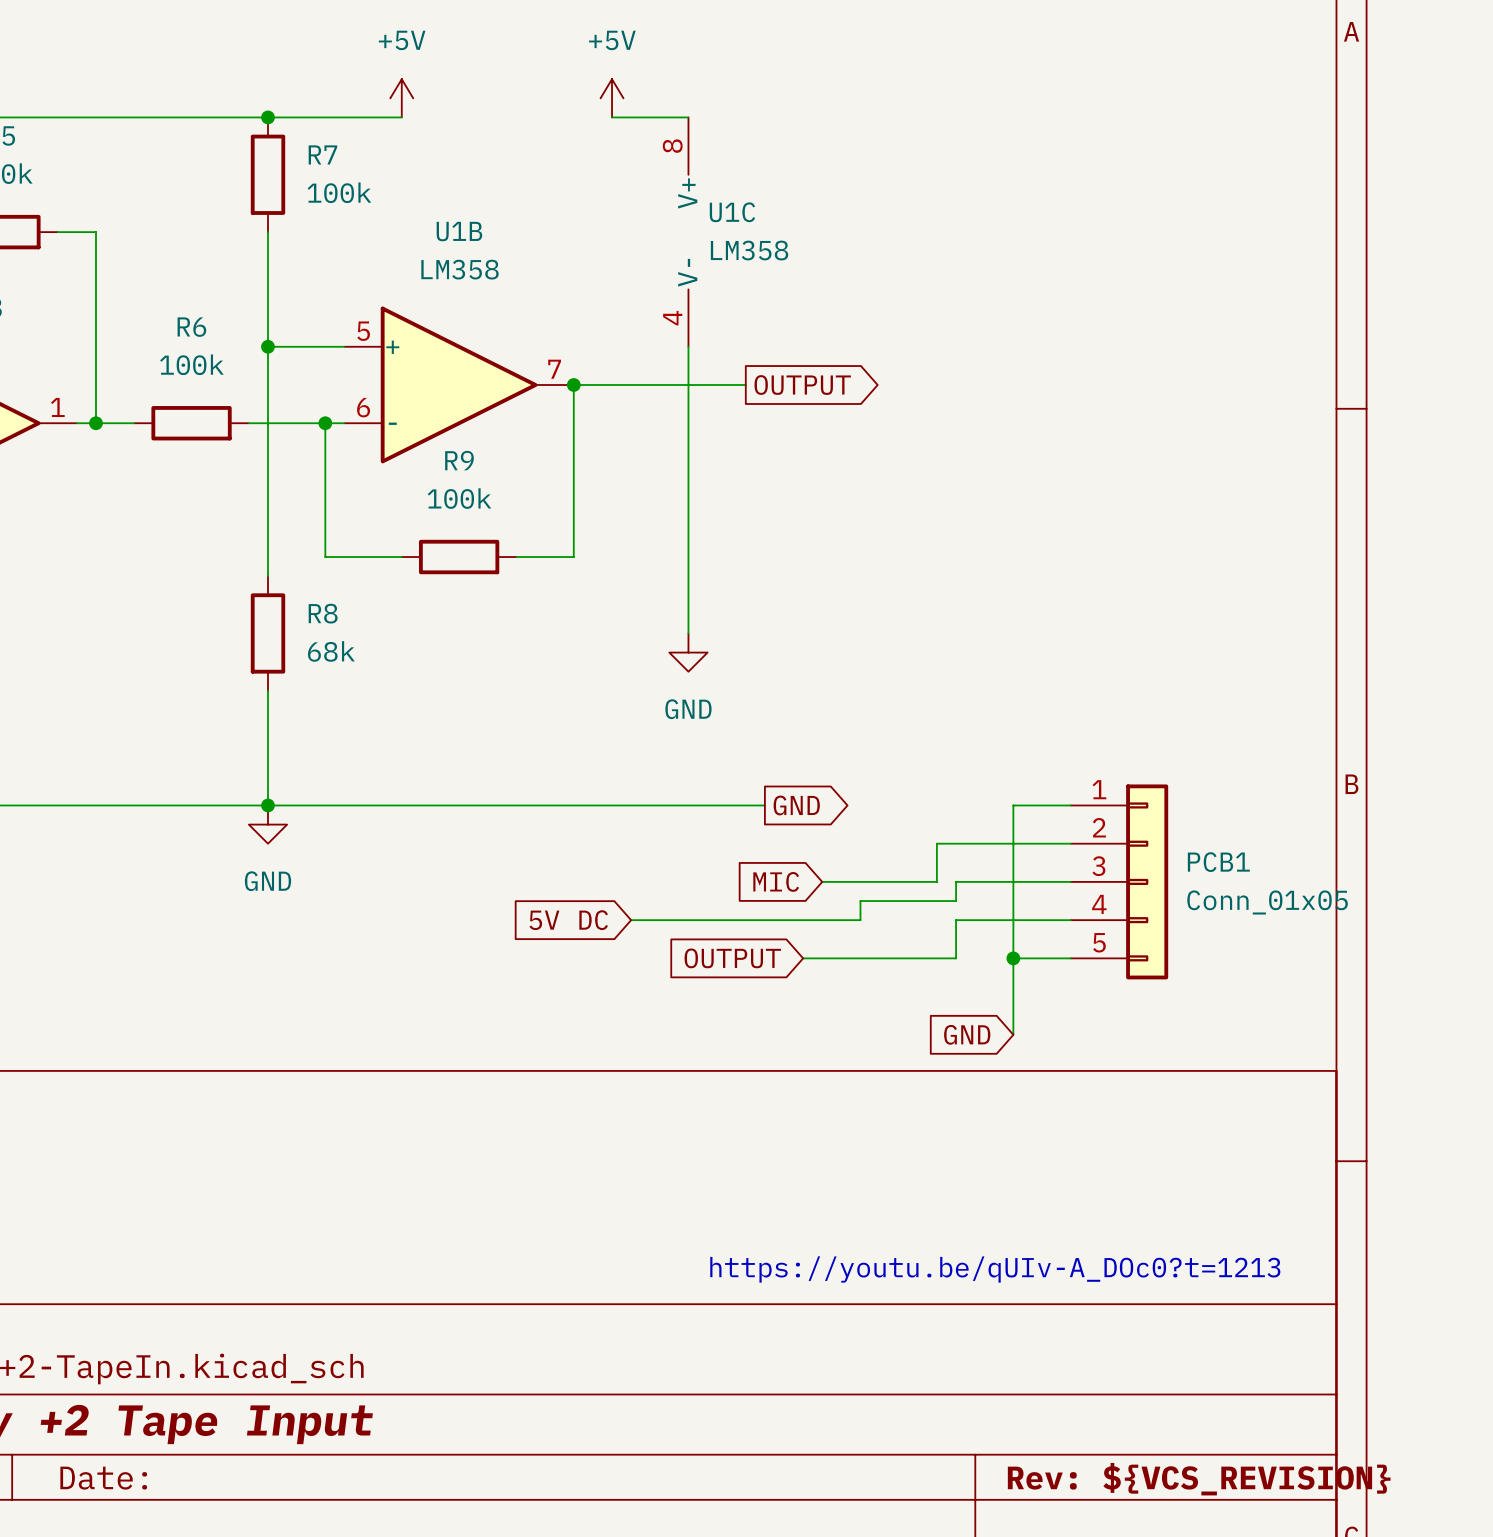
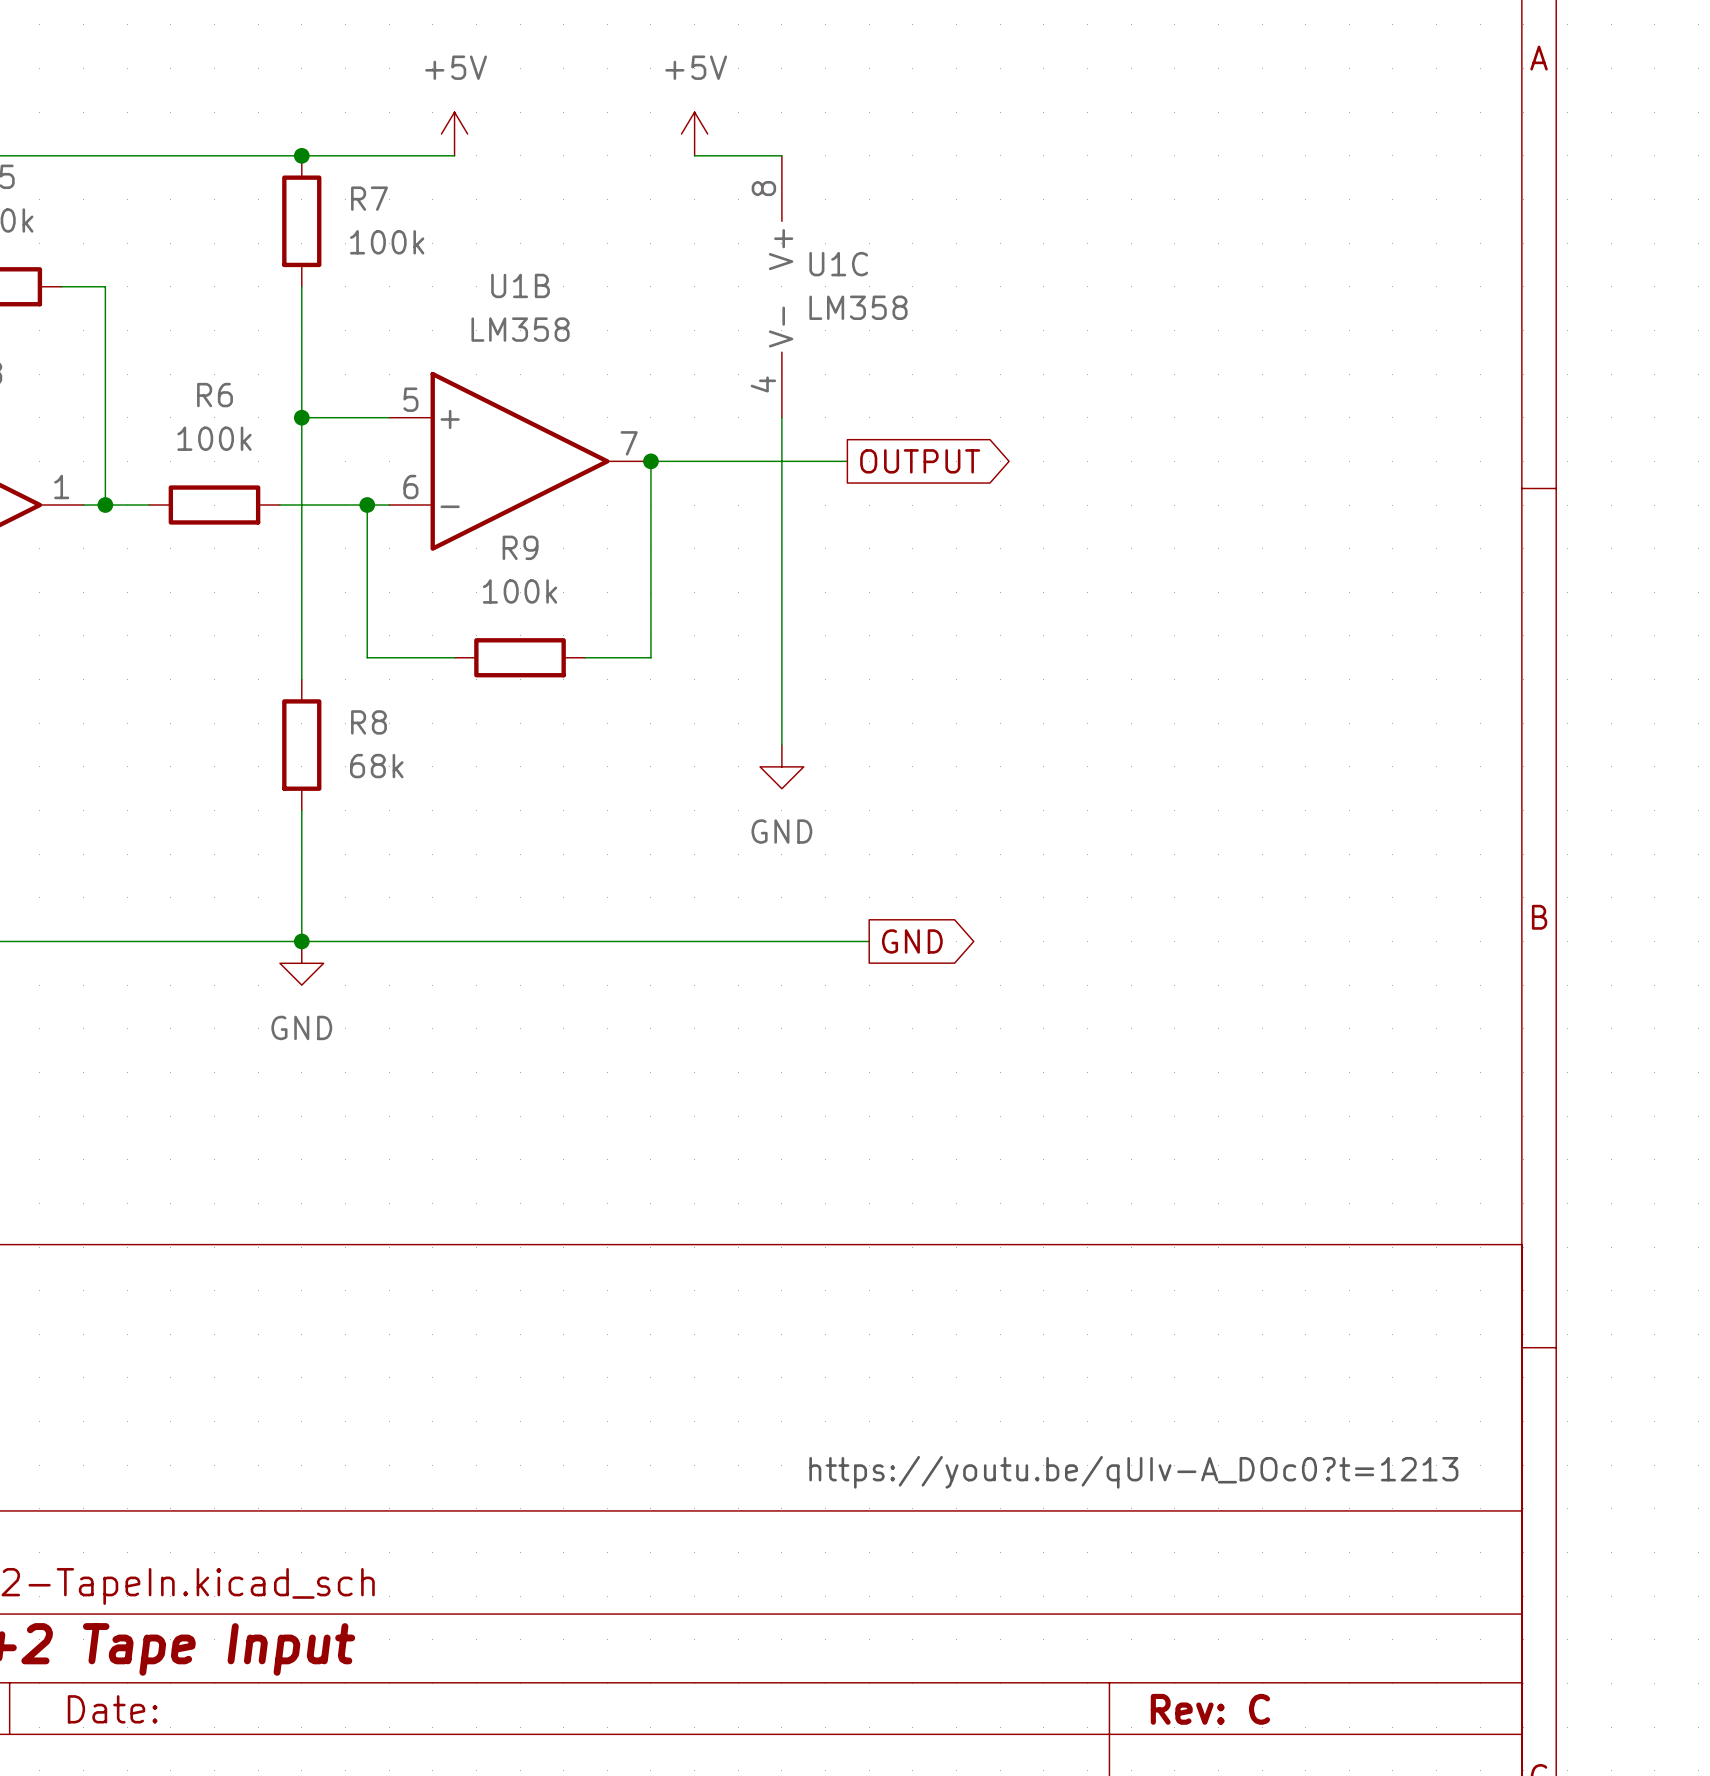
wire: (1070, 805) (1013, 805) (1013, 1034) -> none
wire: (1070, 843) (936, 843) (936, 881) (822, 881) -> none
global label: MIC (776, 881) -> none
wire: (1070, 881) (956, 881) (956, 901) (860, 901) (860, 920) (631, 920) -> none
PCB1: Conn_01x05 (1119, 881) -> none
global label: 5V DC (568, 920) -> none
wire: (1070, 920) (956, 920) (956, 958) (803, 958) -> none
global label: OUTPUT (732, 958) -> none
wire: (1013, 958) (1070, 958) -> none
junction: (1013, 958) -> none
global label: GND (967, 1034) -> none
title block: Rev: ${VCS_REVISION} (1199, 1479) -> Rev: C (1210, 1709)

